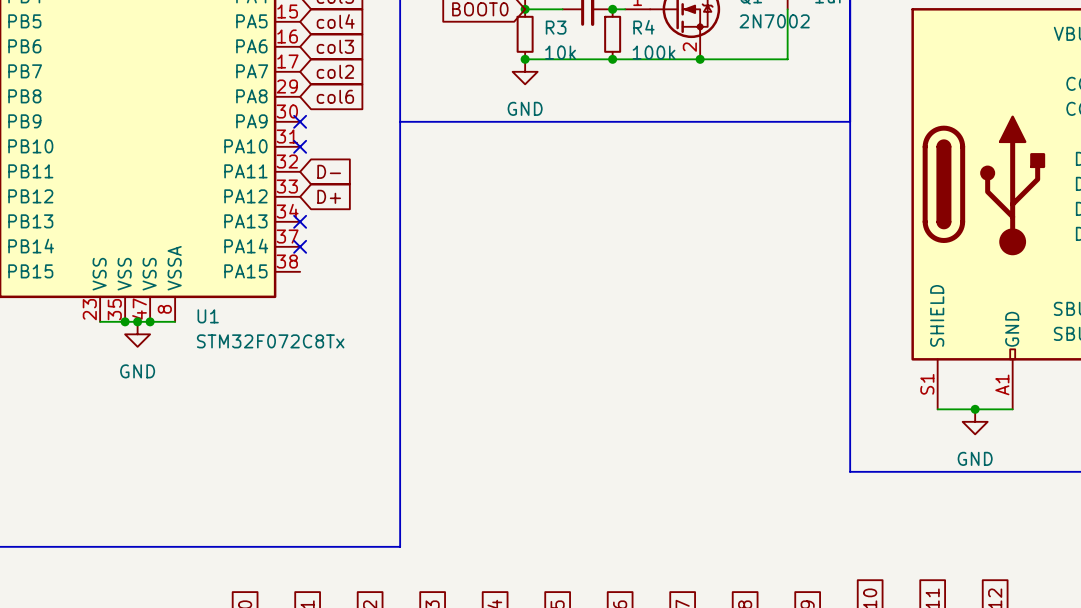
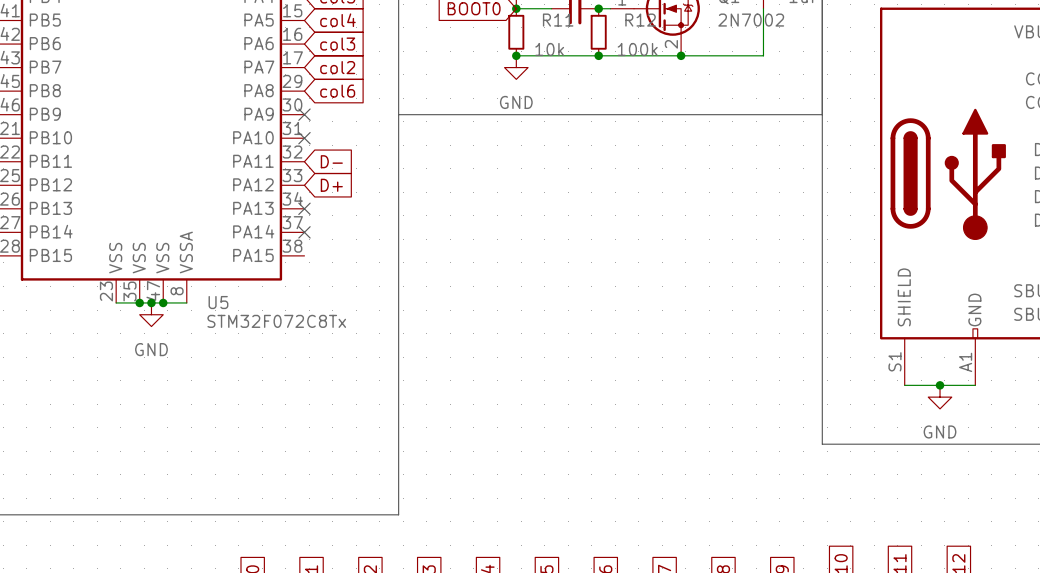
R3 name: R3 (556, 27) -> R11 (558, 20)
R4 name: R4 (643, 27) -> R12 (640, 20)
U1 name: U1 (208, 316) -> U5 (218, 302)

